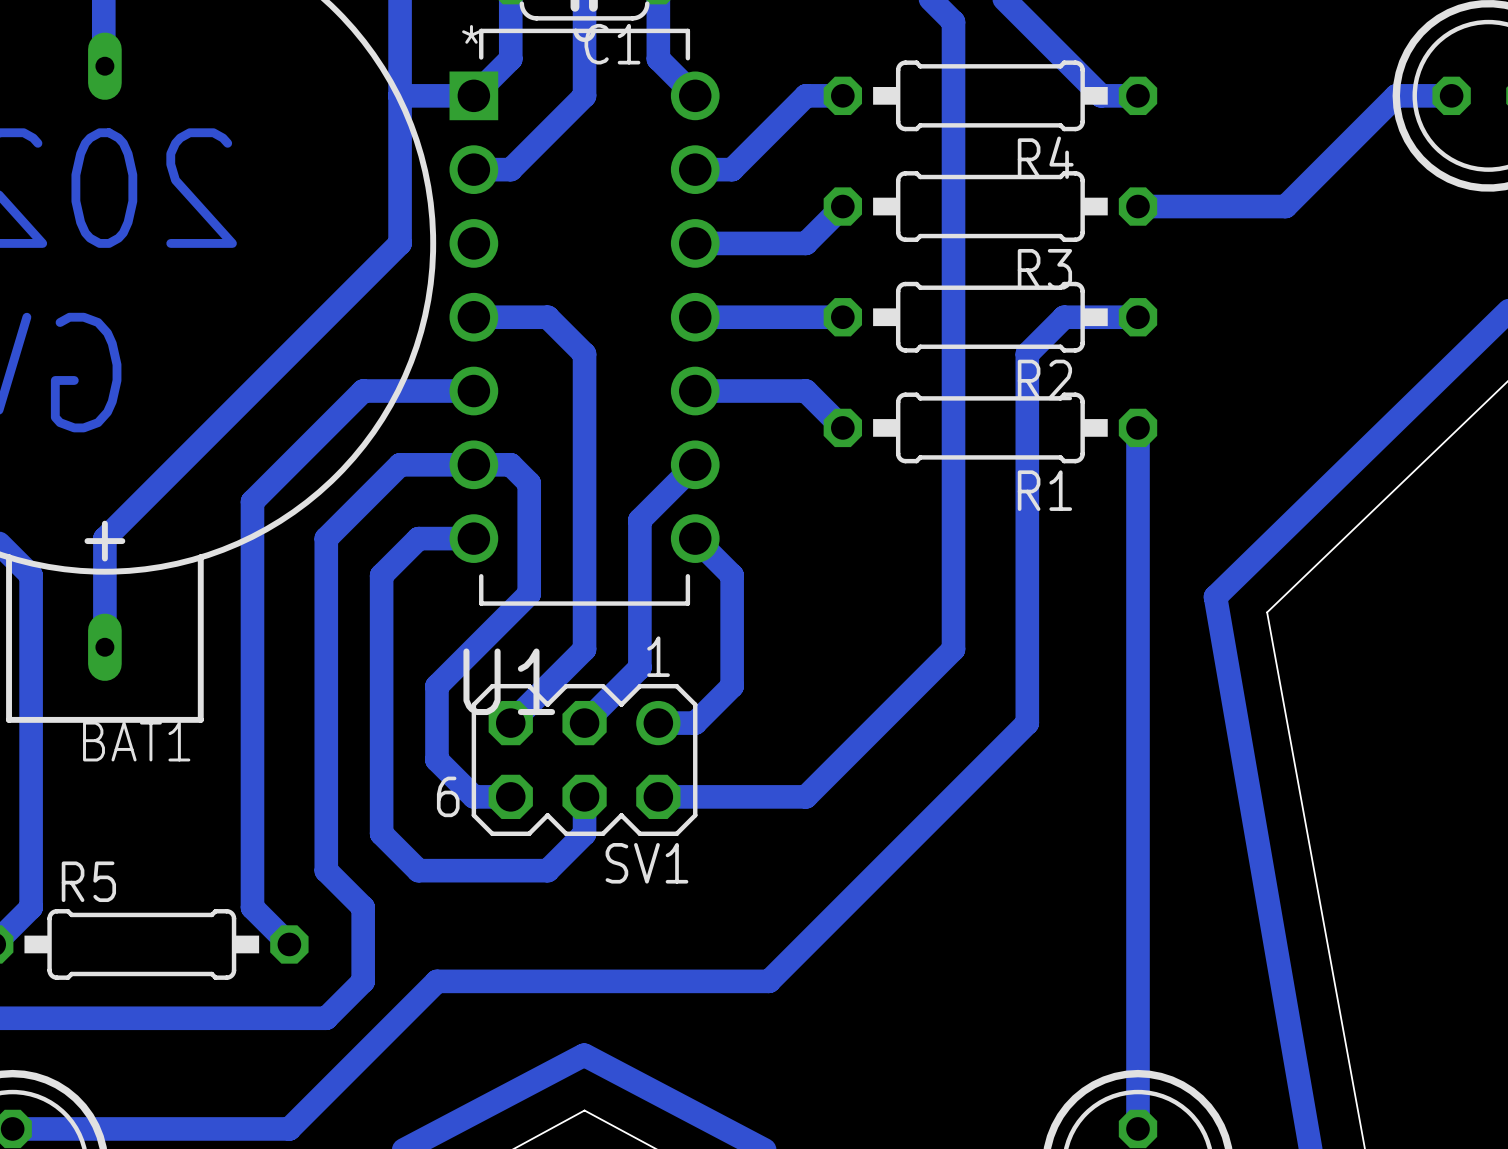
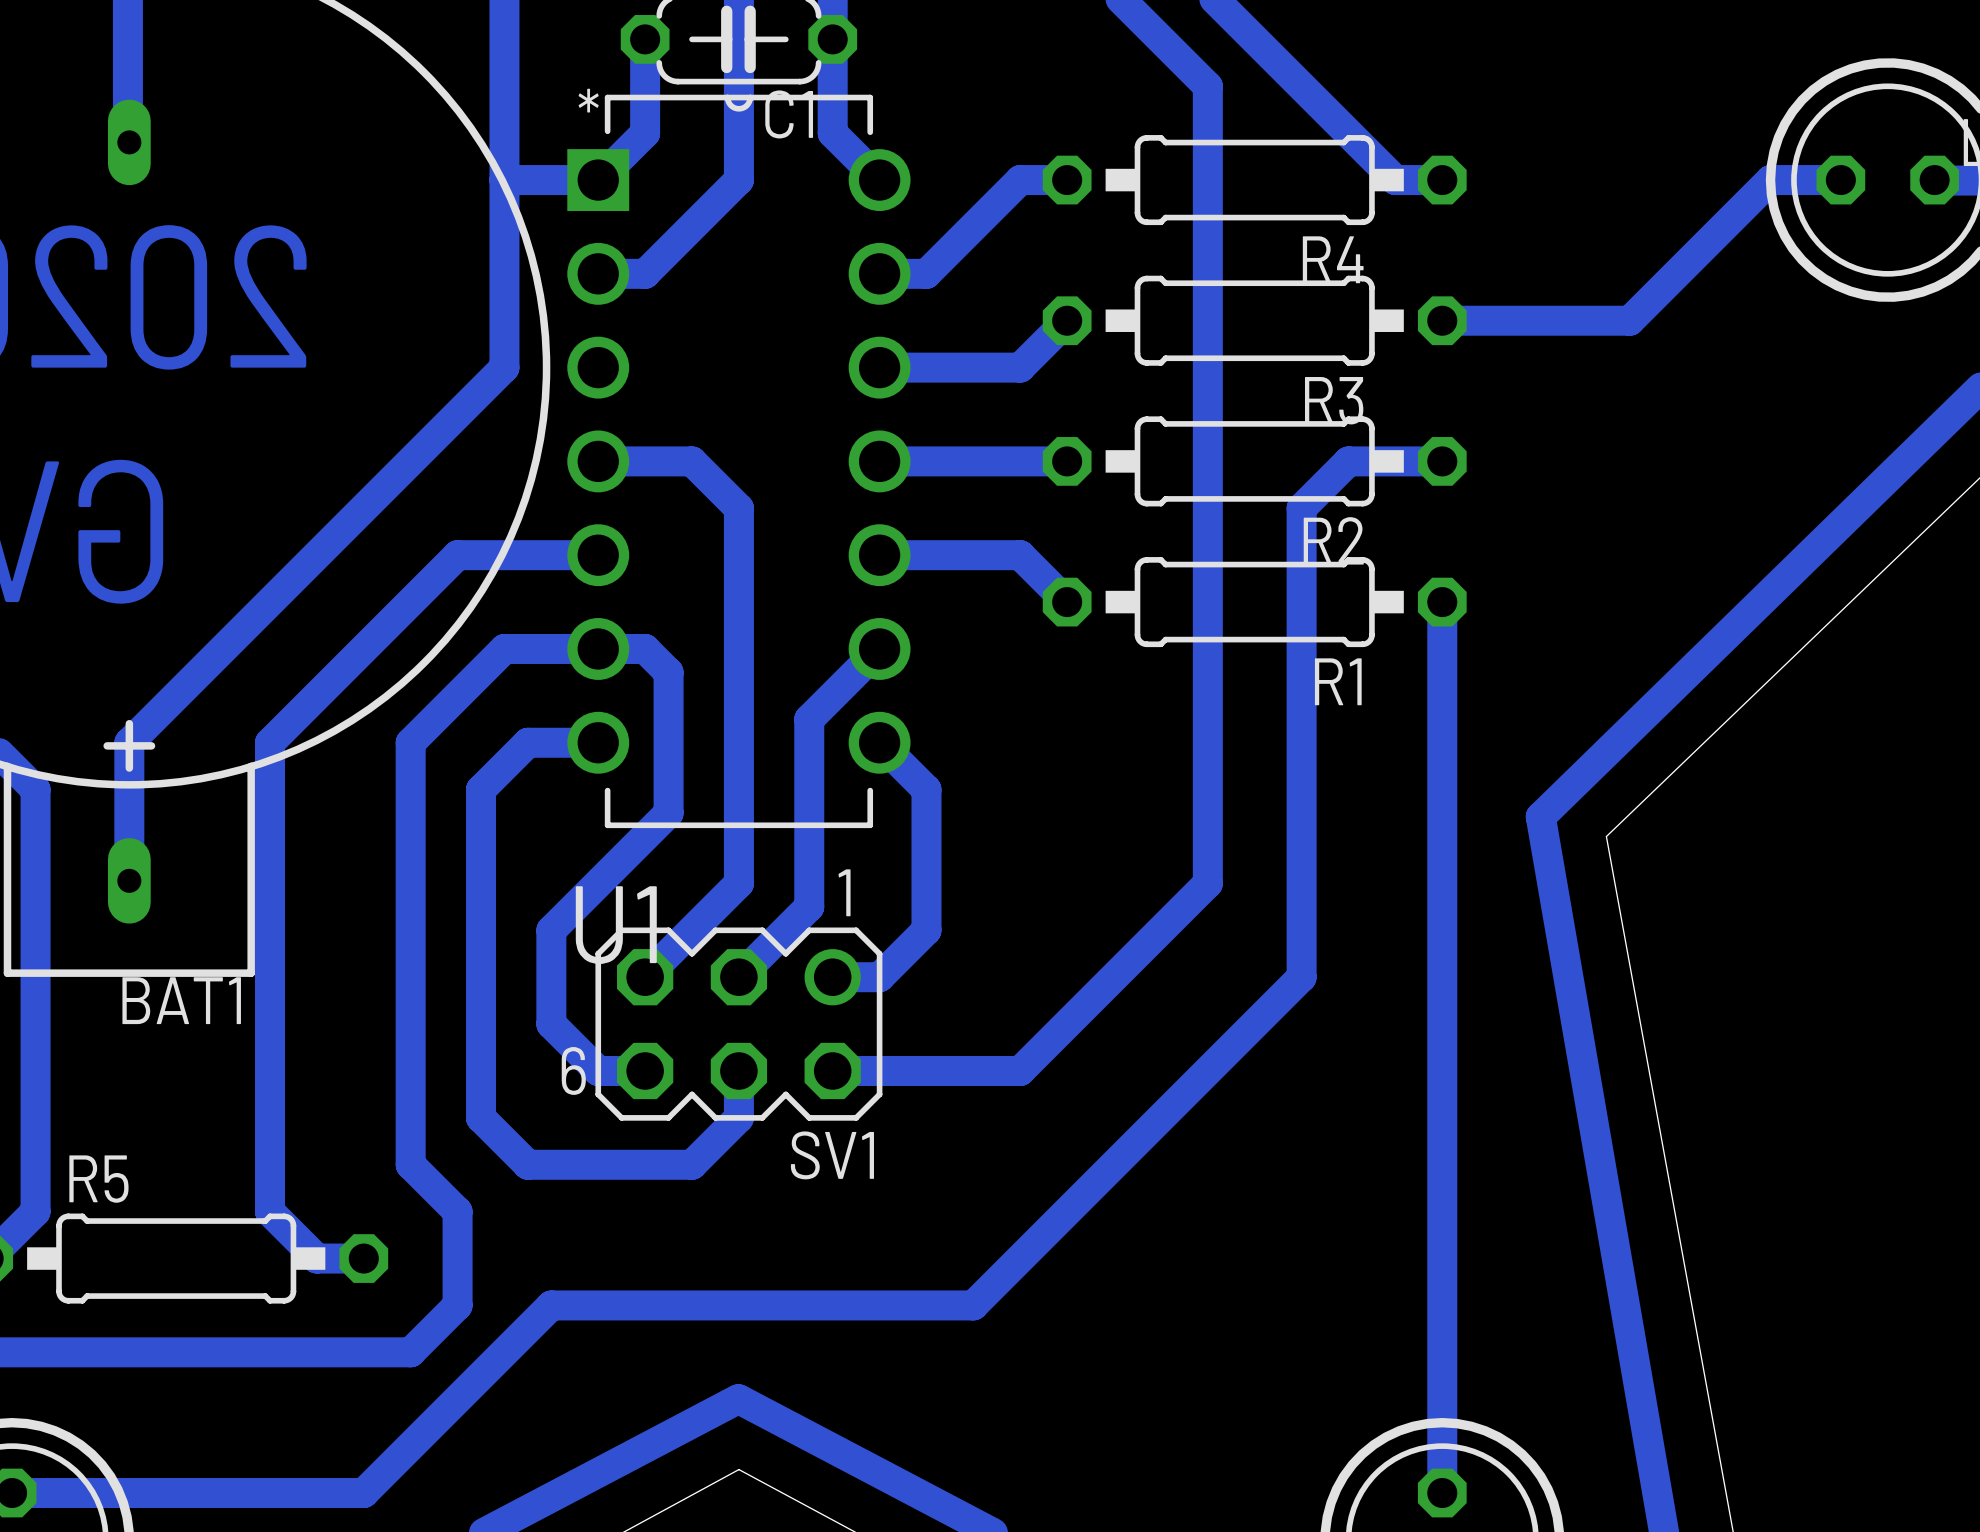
bottom track: (252, 501) (252, 907) (289, 944) -> (316, 695) (270, 742) (270, 1211) (316, 1258) (363, 1258)

